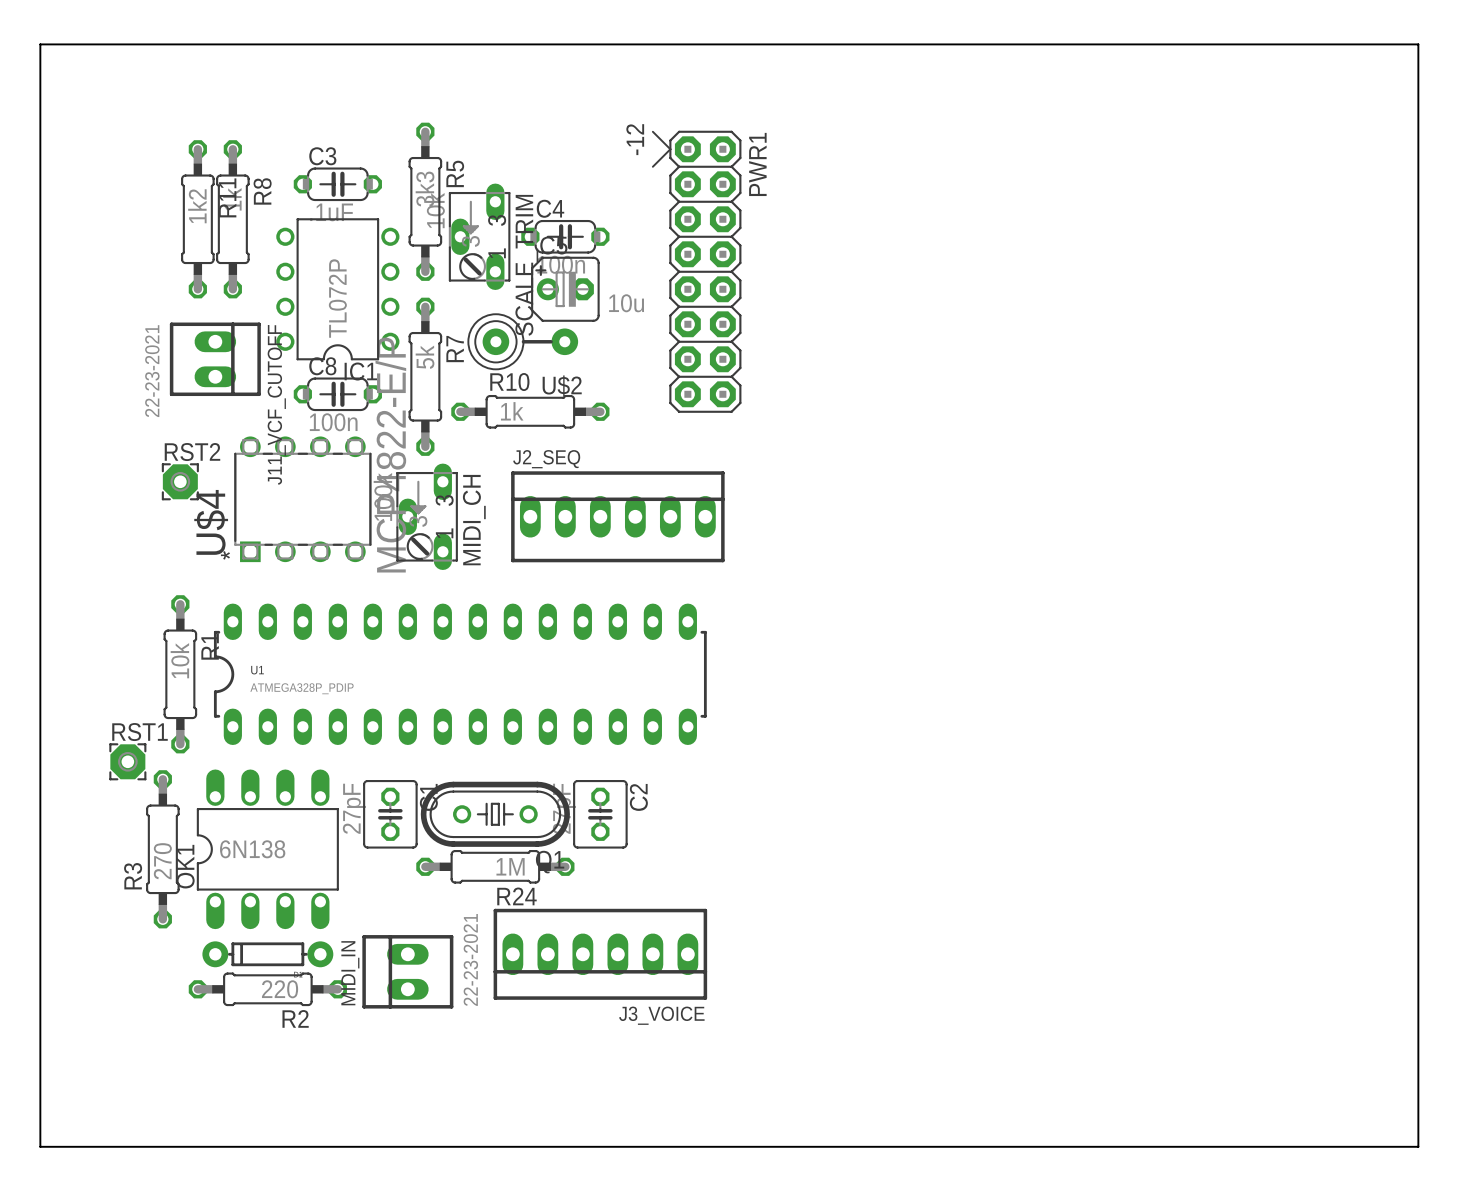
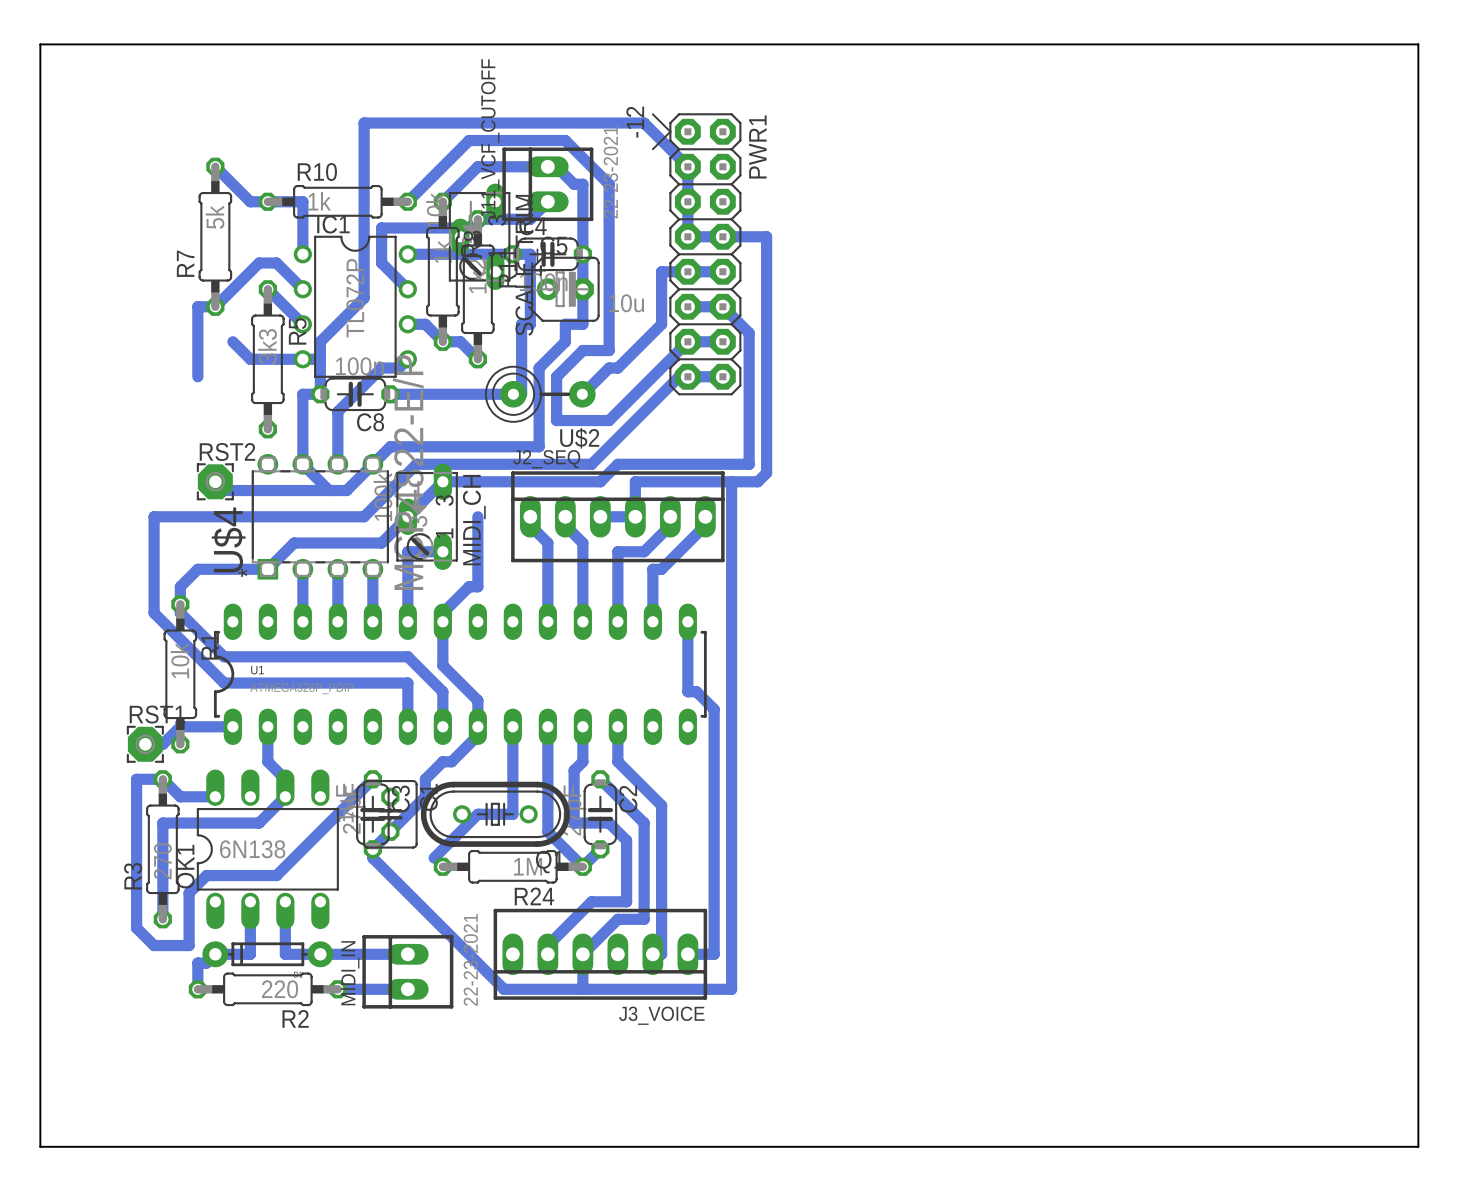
bottom track: none -> (215, 166) (250, 201) (302, 201) (302, 254)
C3 rotation: 0° (337, 184) -> 90° clockwise (372, 814)
C3 position: (337, 184) -> (372, 814)
bottom track: none -> (407, 201) (469, 140) (565, 140) (609, 184) (609, 350) (582, 350) (556, 376) (556, 420) (609, 420) (687, 341) (722, 341)
R5 position: (425, 201) -> (267, 359)
bottom track: none -> (442, 201) (477, 166) (556, 166) (574, 184) (582, 184) (582, 324) (565, 324) (565, 341) (539, 368) (539, 446) (390, 446) (346, 490) (224, 490) (215, 481)
bottom track: none -> (547, 201) (530, 219) (477, 219) (469, 228) (381, 228) (381, 263) (407, 289)
R11 position: (197, 219) -> (477, 289)
R8 position: (232, 219) -> (442, 271)
C4 position: (565, 236) -> (547, 254)
bottom track: none -> (407, 254) (530, 254) (530, 324) (521, 324) (521, 394) (390, 394)
PWR1 position: (696, 271) -> (696, 254)
bottom track: none -> (722, 271) (661, 271) (661, 324) (617, 368) (609, 368) (582, 394)
bottom track: none -> (267, 289) (302, 324)
bottom track: none -> (302, 289) (276, 263) (259, 263) (215, 306) (197, 306) (197, 376)
IC1 rotation: 0° (337, 289) -> 180° (355, 306)
bottom track: none -> (687, 306) (722, 306) (749, 333) (749, 464) (617, 464) (600, 481) (442, 481) (381, 543) (294, 543) (267, 569) (197, 569) (180, 586) (180, 613) (224, 656) (407, 656) (442, 691) (442, 726)
bottom track: none -> (407, 324) (425, 324) (442, 341) (460, 341) (477, 359)
bottom track: none -> (232, 341) (250, 359) (320, 359)
U$2 position: (522, 341) -> (540, 394)
R7 name position: R7 (455, 349) -> R7 (185, 263)
J11_VCF_CUTOFF rotation: 0° (215, 359) -> 180° (547, 184)
J11_VCF_CUTOFF position: (215, 359) -> (547, 184)
bottom track: none -> (407, 359) (399, 368) (381, 368) (337, 411) (337, 464)
R7 position: (425, 376) -> (215, 236)
bottom track: none -> (722, 376) (679, 376) (591, 464) (416, 464) (364, 516) (154, 516) (154, 613) (224, 683) (407, 683) (407, 726)
C8 rotation: 0° (337, 394) -> 180° (355, 394)
R10 position: (530, 411) -> (337, 201)
RST2 position: (180, 481) -> (215, 481)
bottom track: none -> (731, 481) (731, 989) (504, 989) (372, 858) (372, 849) (425, 796) (425, 779) (442, 761) (451, 761) (477, 735) (477, 700) (442, 665) (442, 613) (469, 586) (477, 586) (477, 516)
bottom track: none -> (329, 490) (302, 464) (302, 394) (320, 394) (320, 341) (364, 298) (364, 123) (644, 123) (687, 166) (687, 236) (766, 236) (766, 473) (757, 481) (635, 481) (635, 516) (600, 516)
U$4 position: (302, 499) -> (320, 516)
bottom track: none -> (530, 516) (530, 525) (547, 543) (547, 621)
bottom track: none -> (565, 516) (565, 525) (582, 543) (582, 621)
bottom track: none -> (670, 516) (670, 525) (644, 551) (617, 551) (617, 621)
bottom track: none -> (705, 516) (705, 525) (661, 569) (652, 569) (652, 621)
bottom track: none -> (442, 551) (407, 551) (407, 621)
bottom track: none -> (302, 569) (302, 621)
bottom track: none -> (337, 569) (337, 621)
bottom track: none -> (372, 569) (372, 621)
bottom track: none -> (687, 621) (687, 691) (696, 691) (714, 709) (714, 954) (687, 954)
bottom track: none -> (232, 726) (180, 726) (162, 744) (145, 744)
bottom track: none -> (267, 726) (267, 761) (285, 779) (285, 796) (259, 823) (162, 823) (162, 919)
bottom track: none -> (512, 726) (512, 814) (477, 814) (434, 858)
bottom track: none -> (547, 726) (547, 831) (582, 866) (600, 849)
bottom track: none -> (582, 726) (582, 761) (574, 770) (574, 823) (609, 823) (626, 840) (626, 901) (591, 901) (547, 945) (547, 954)
bottom track: none -> (617, 726) (617, 761) (661, 805) (661, 954) (652, 954)
RST1 position: (127, 761) -> (145, 744)
bottom track: none -> (372, 779) (276, 875) (206, 875) (189, 893) (189, 945) (154, 945) (136, 928) (136, 779) (162, 779) (180, 796) (215, 796)
bottom track: none -> (600, 779) (644, 823) (644, 919) (617, 919) (582, 954) (582, 989)
C2 footprint: [573, 780, 628, 849] -> [583, 770, 618, 859]
R24 position: (495, 866) -> (512, 866)
bottom track: none -> (250, 901) (250, 954) (215, 954) (206, 963) (197, 963) (197, 989)
bottom track: none -> (285, 901) (285, 954) (407, 954)
bottom track: none -> (337, 989) (407, 989)

